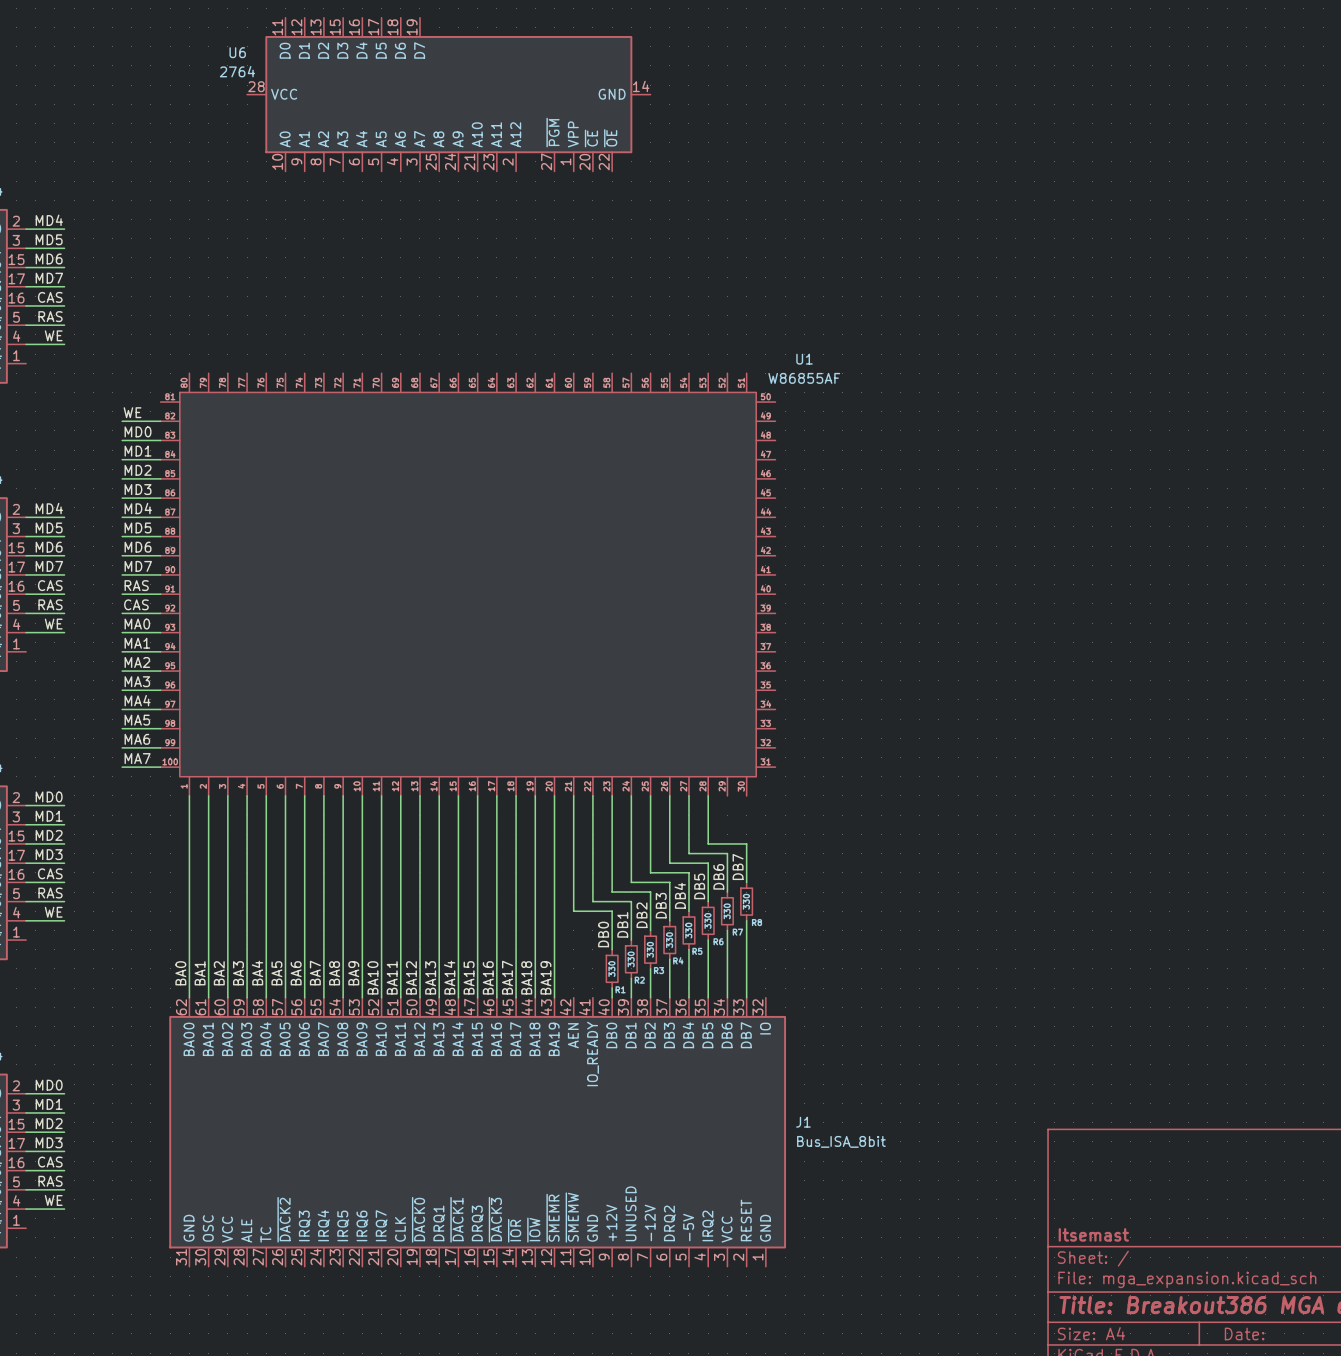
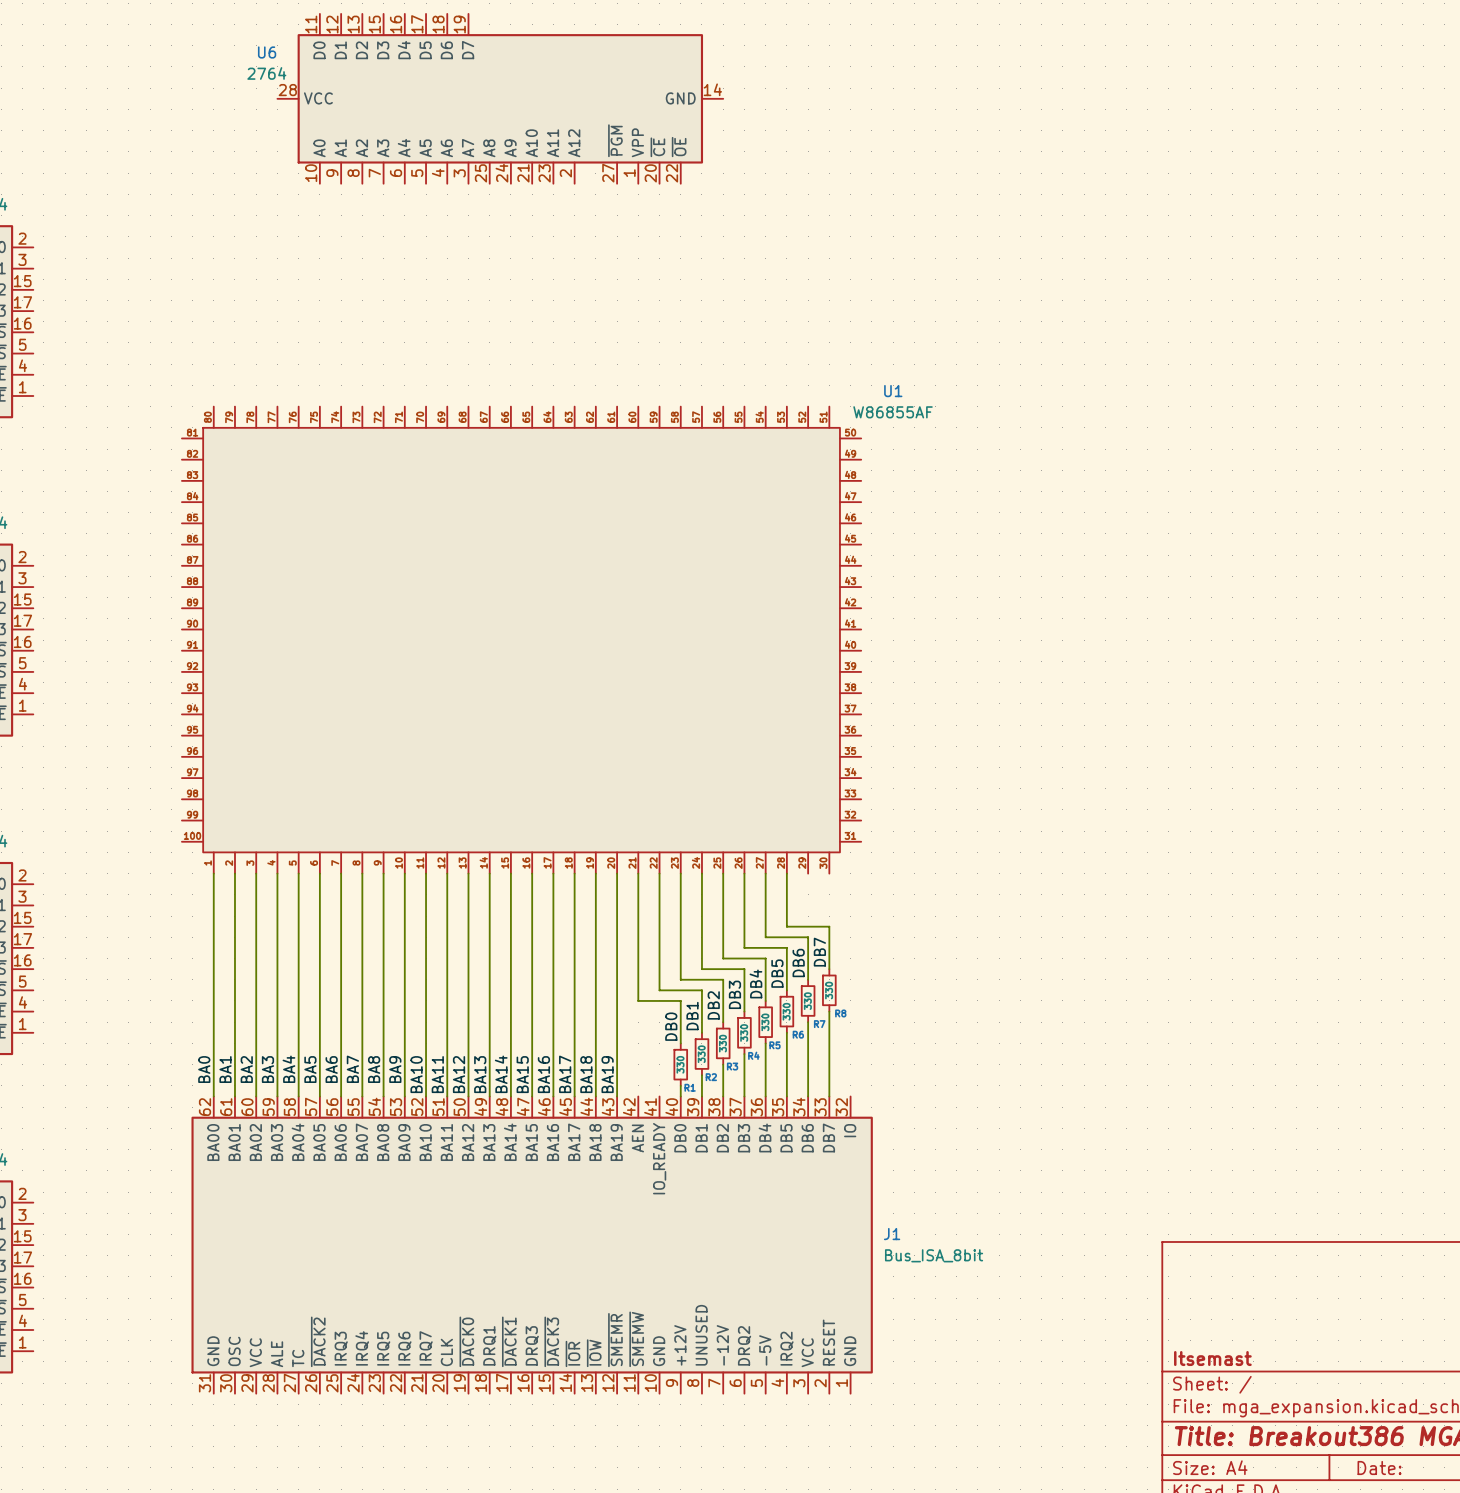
label: MD4 (49, 220) -> none
wire: (26, 229) (64, 229) -> none
label: MD5 (49, 239) -> none
wire: (26, 248) (64, 248) -> none
label: MD6 (49, 258) -> none
wire: (26, 267) (64, 267) -> none
label: MD7 (49, 278) -> none
wire: (26, 286) (64, 286) -> none
label: CAS (50, 297) -> none
wire: (26, 305) (64, 305) -> none
label: RAS (50, 316) -> none
wire: (26, 325) (64, 325) -> none
label: WE (53, 335) -> none
wire: (26, 344) (64, 344) -> none
label: WE (132, 412) -> none
wire: (122, 421) (160, 421) -> none
label: MD0 (138, 431) -> none
wire: (122, 440) (160, 440) -> none
label: MD1 (138, 451) -> none
wire: (122, 459) (160, 459) -> none
label: MD2 (138, 470) -> none
wire: (122, 478) (160, 478) -> none
label: MD3 (138, 489) -> none
wire: (122, 498) (160, 498) -> none
label: MD4 (49, 508) -> none
label: MD4 (138, 508) -> none
wire: (26, 517) (64, 517) -> none
wire: (122, 517) (160, 517) -> none
label: MD5 (49, 527) -> none
label: MD5 (138, 527) -> none
wire: (26, 536) (64, 536) -> none
wire: (122, 536) (160, 536) -> none
label: MD6 (49, 547) -> none
label: MD6 (138, 547) -> none
wire: (26, 555) (64, 555) -> none
wire: (122, 555) (160, 555) -> none
label: MD7 (49, 566) -> none
label: MD7 (138, 566) -> none
wire: (26, 574) (64, 574) -> none
wire: (122, 574) (160, 574) -> none
label: CAS (50, 585) -> none
label: RAS (136, 585) -> none
wire: (26, 594) (64, 594) -> none
wire: (122, 594) (160, 594) -> none
label: RAS (50, 604) -> none
label: CAS (136, 604) -> none
wire: (26, 613) (64, 613) -> none
wire: (122, 613) (160, 613) -> none
label: WE (53, 624) -> none
label: MA0 (137, 624) -> none
wire: (26, 632) (64, 632) -> none
wire: (122, 632) (160, 632) -> none
label: MA1 (137, 643) -> none
wire: (122, 651) (160, 651) -> none
label: MA2 (137, 662) -> none
wire: (122, 671) (160, 671) -> none
label: MA3 (137, 681) -> none
wire: (122, 690) (160, 690) -> none
label: MA4 (137, 700) -> none
wire: (122, 709) (160, 709) -> none
label: MA5 (137, 720) -> none
wire: (122, 728) (160, 728) -> none
label: MA6 (137, 739) -> none
wire: (122, 747) (160, 747) -> none
label: MA7 (137, 758) -> none
wire: (122, 767) (160, 767) -> none
label: MD0 (49, 796) -> none
wire: (26, 805) (64, 805) -> none
label: MD1 (49, 816) -> none
wire: (26, 824) (64, 824) -> none
label: MD2 (49, 835) -> none
wire: (26, 843) (64, 843) -> none
label: MD3 (49, 854) -> none
wire: (26, 863) (64, 863) -> none
label: CAS (50, 873) -> none
wire: (26, 882) (64, 882) -> none
label: RAS (50, 893) -> none
wire: (26, 901) (64, 901) -> none
label: WE (53, 912) -> none
wire: (26, 920) (64, 920) -> none
label: MD0 (49, 1085) -> none
wire: (26, 1093) (64, 1093) -> none
label: MD1 (49, 1104) -> none
wire: (26, 1112) (64, 1112) -> none
label: MD2 (49, 1123) -> none
wire: (26, 1132) (64, 1132) -> none
label: MD3 (49, 1142) -> none
wire: (26, 1151) (64, 1151) -> none
label: CAS (50, 1162) -> none
wire: (26, 1170) (64, 1170) -> none
label: RAS (50, 1181) -> none
wire: (26, 1189) (64, 1189) -> none
label: WE (53, 1200) -> none
wire: (26, 1209) (64, 1209) -> none

